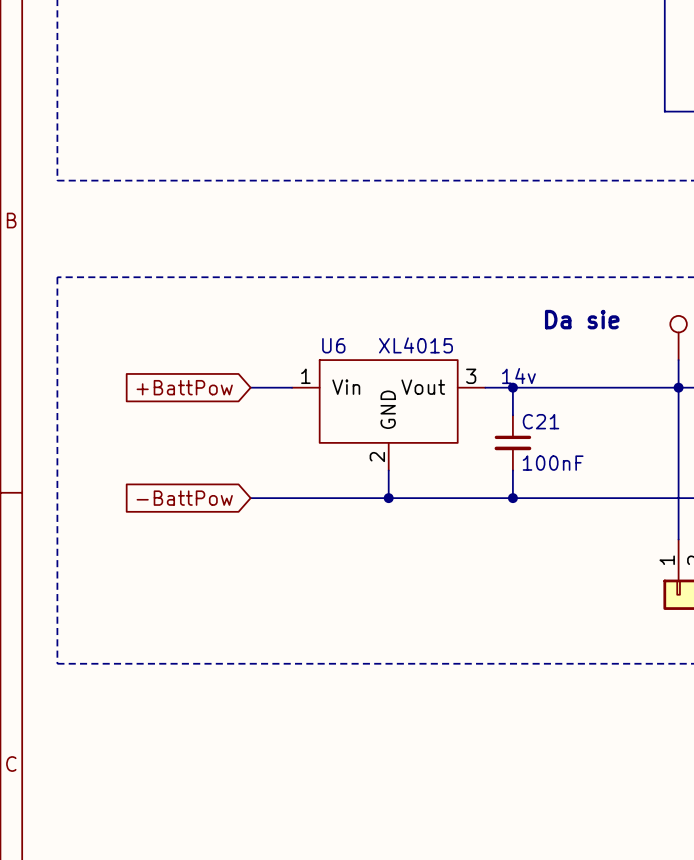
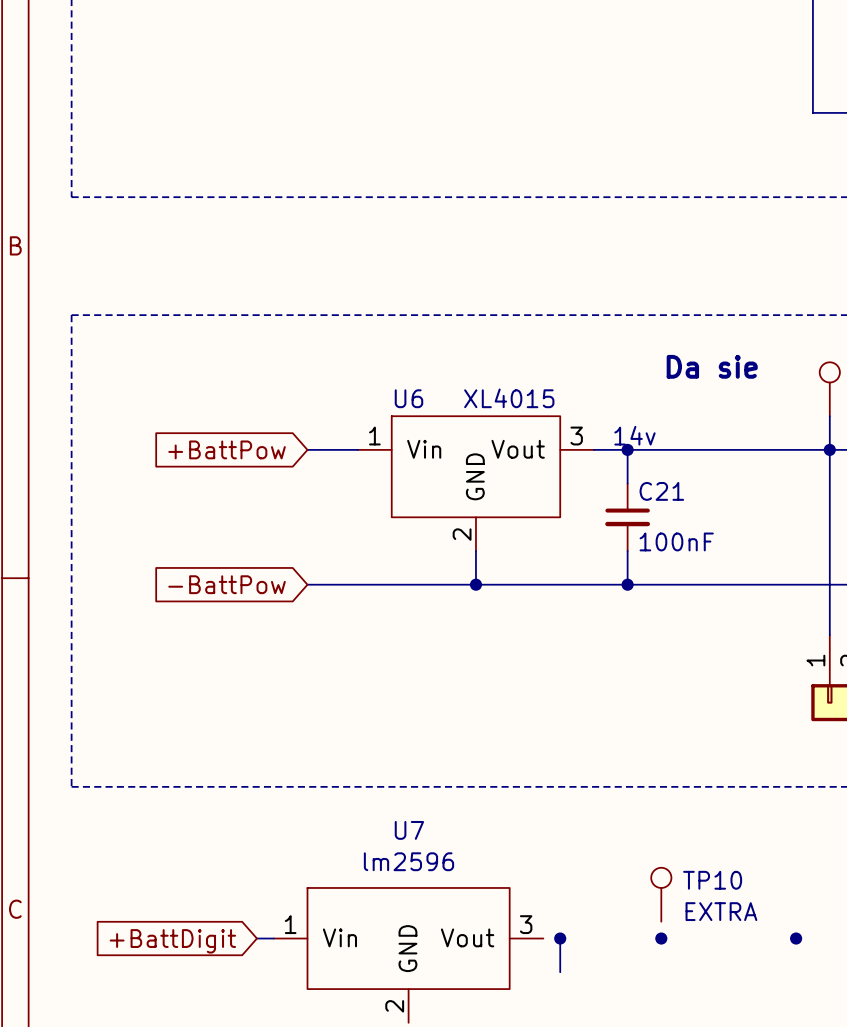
TP10: none -> EXTRA (661, 894)
wire: none -> (256, 938) (273, 938)
wire: none -> (560, 938) (560, 972)
junction: none -> (560, 938)
junction: none -> (661, 938)
junction: none -> (796, 938)
global label: none -> +BattDigit (172, 941)
U7: none -> lm2596 (408, 955)

